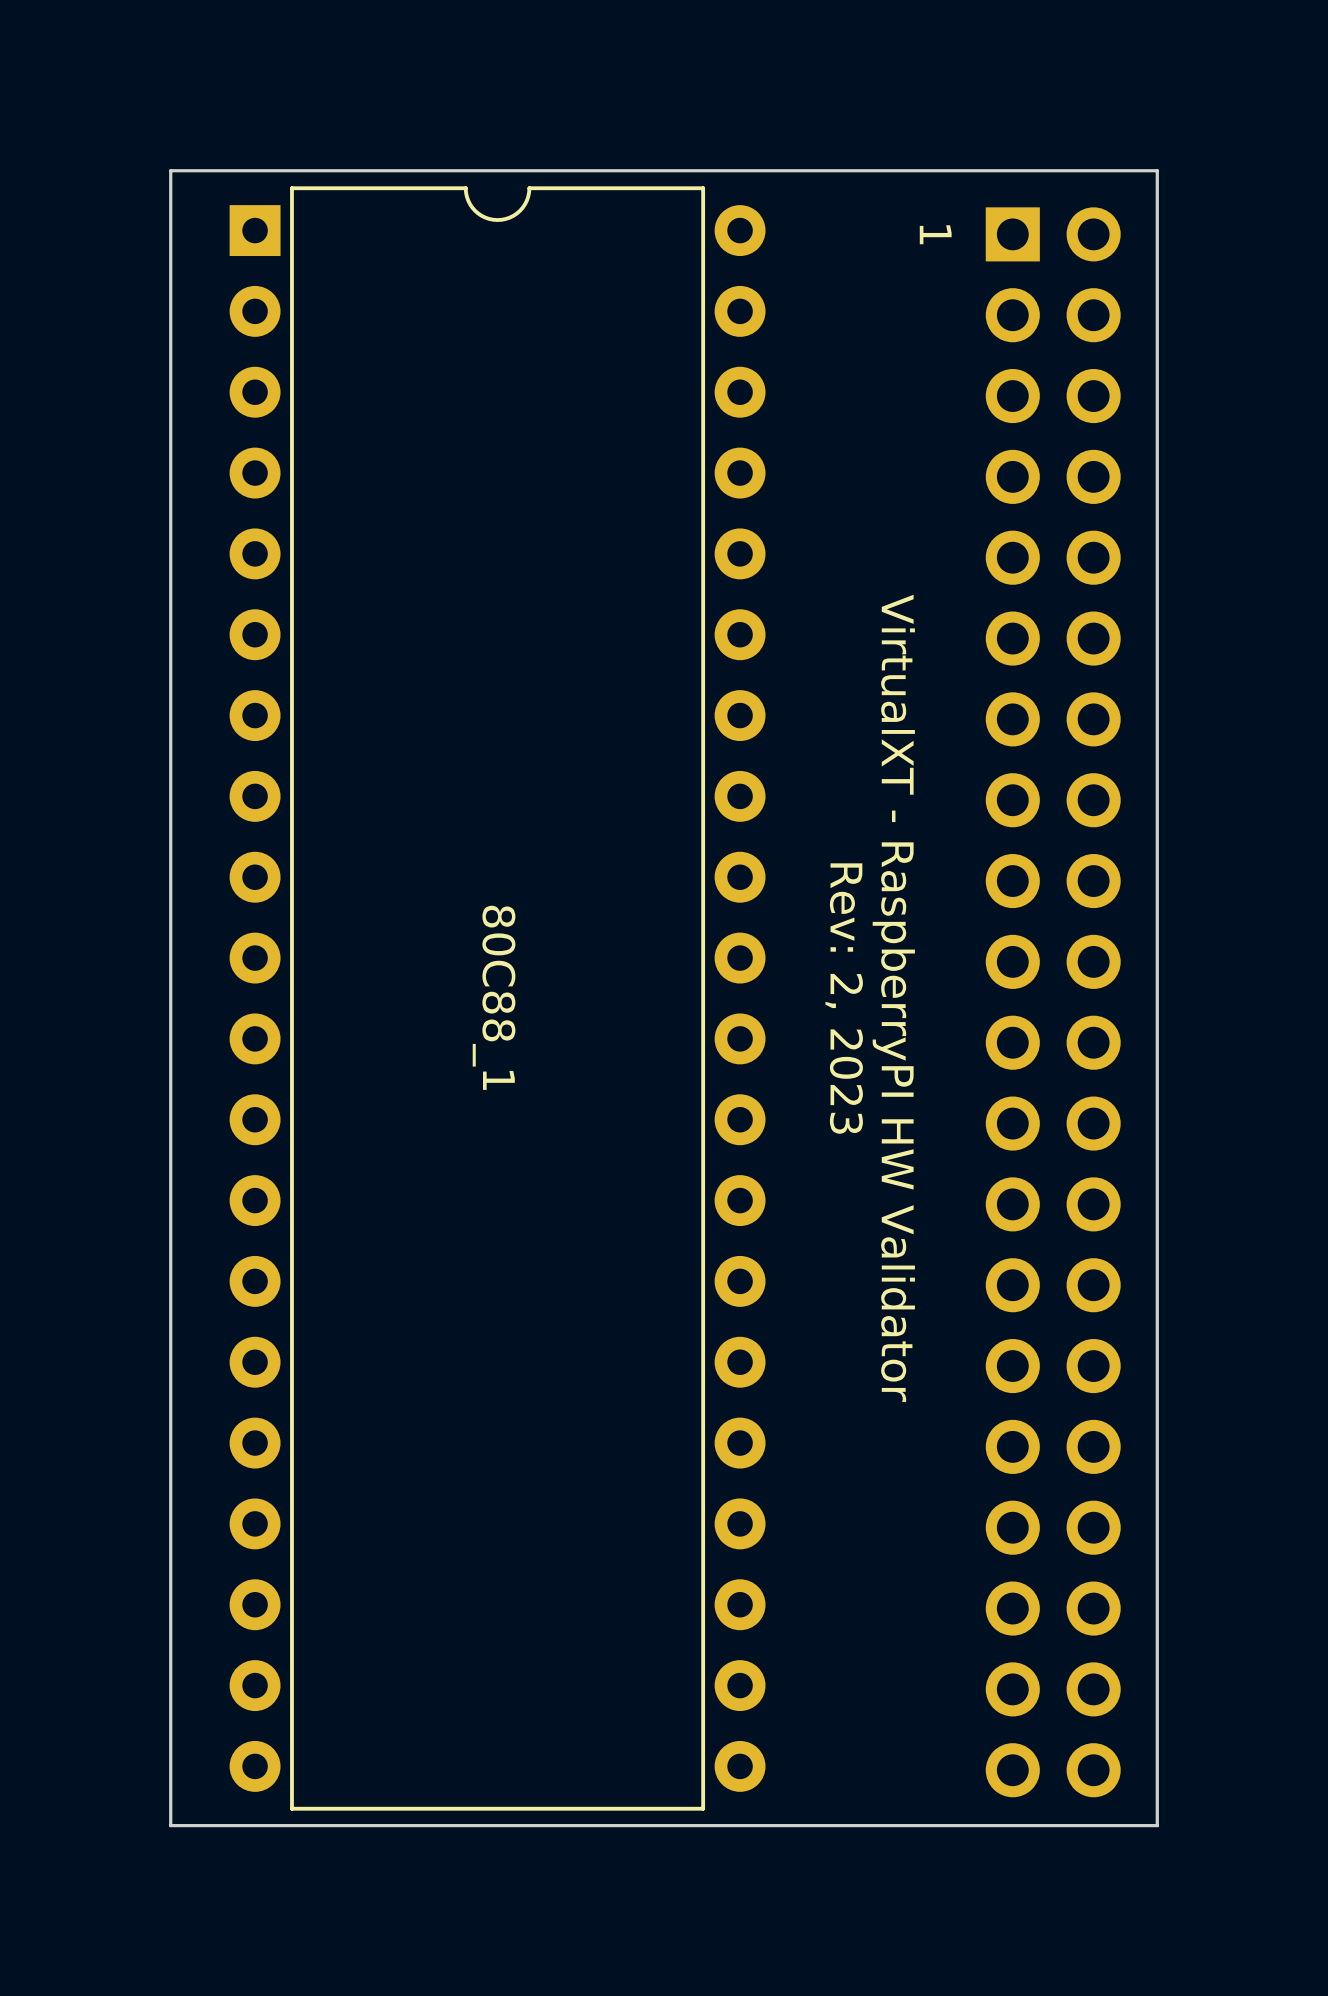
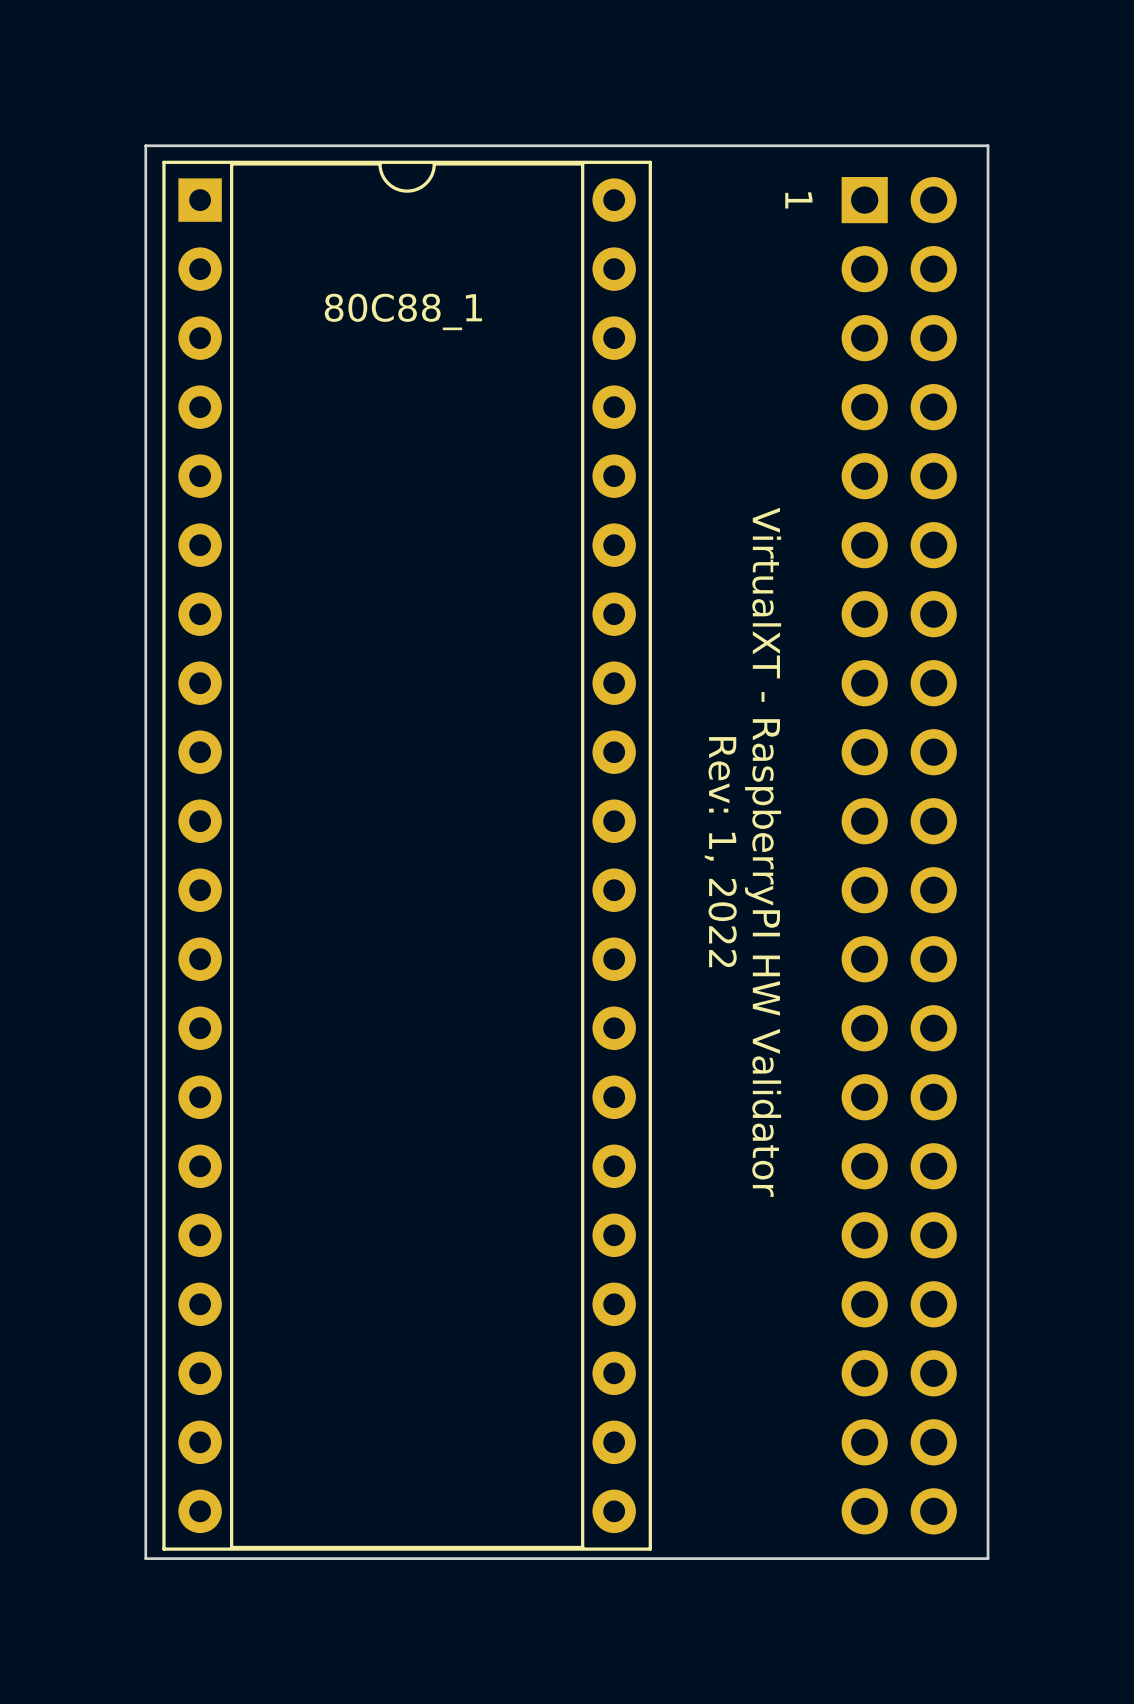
80C88_1 footprint: [229, 186, 766, 1811] -> [162, 160, 652, 1551]
80C88_1 name position: 80C88_1 (494, 997) -> 80C88_1 (403, 311)
text: Rev: 2, 2023 (844, 998) -> Rev: 1, 2022 (720, 852)

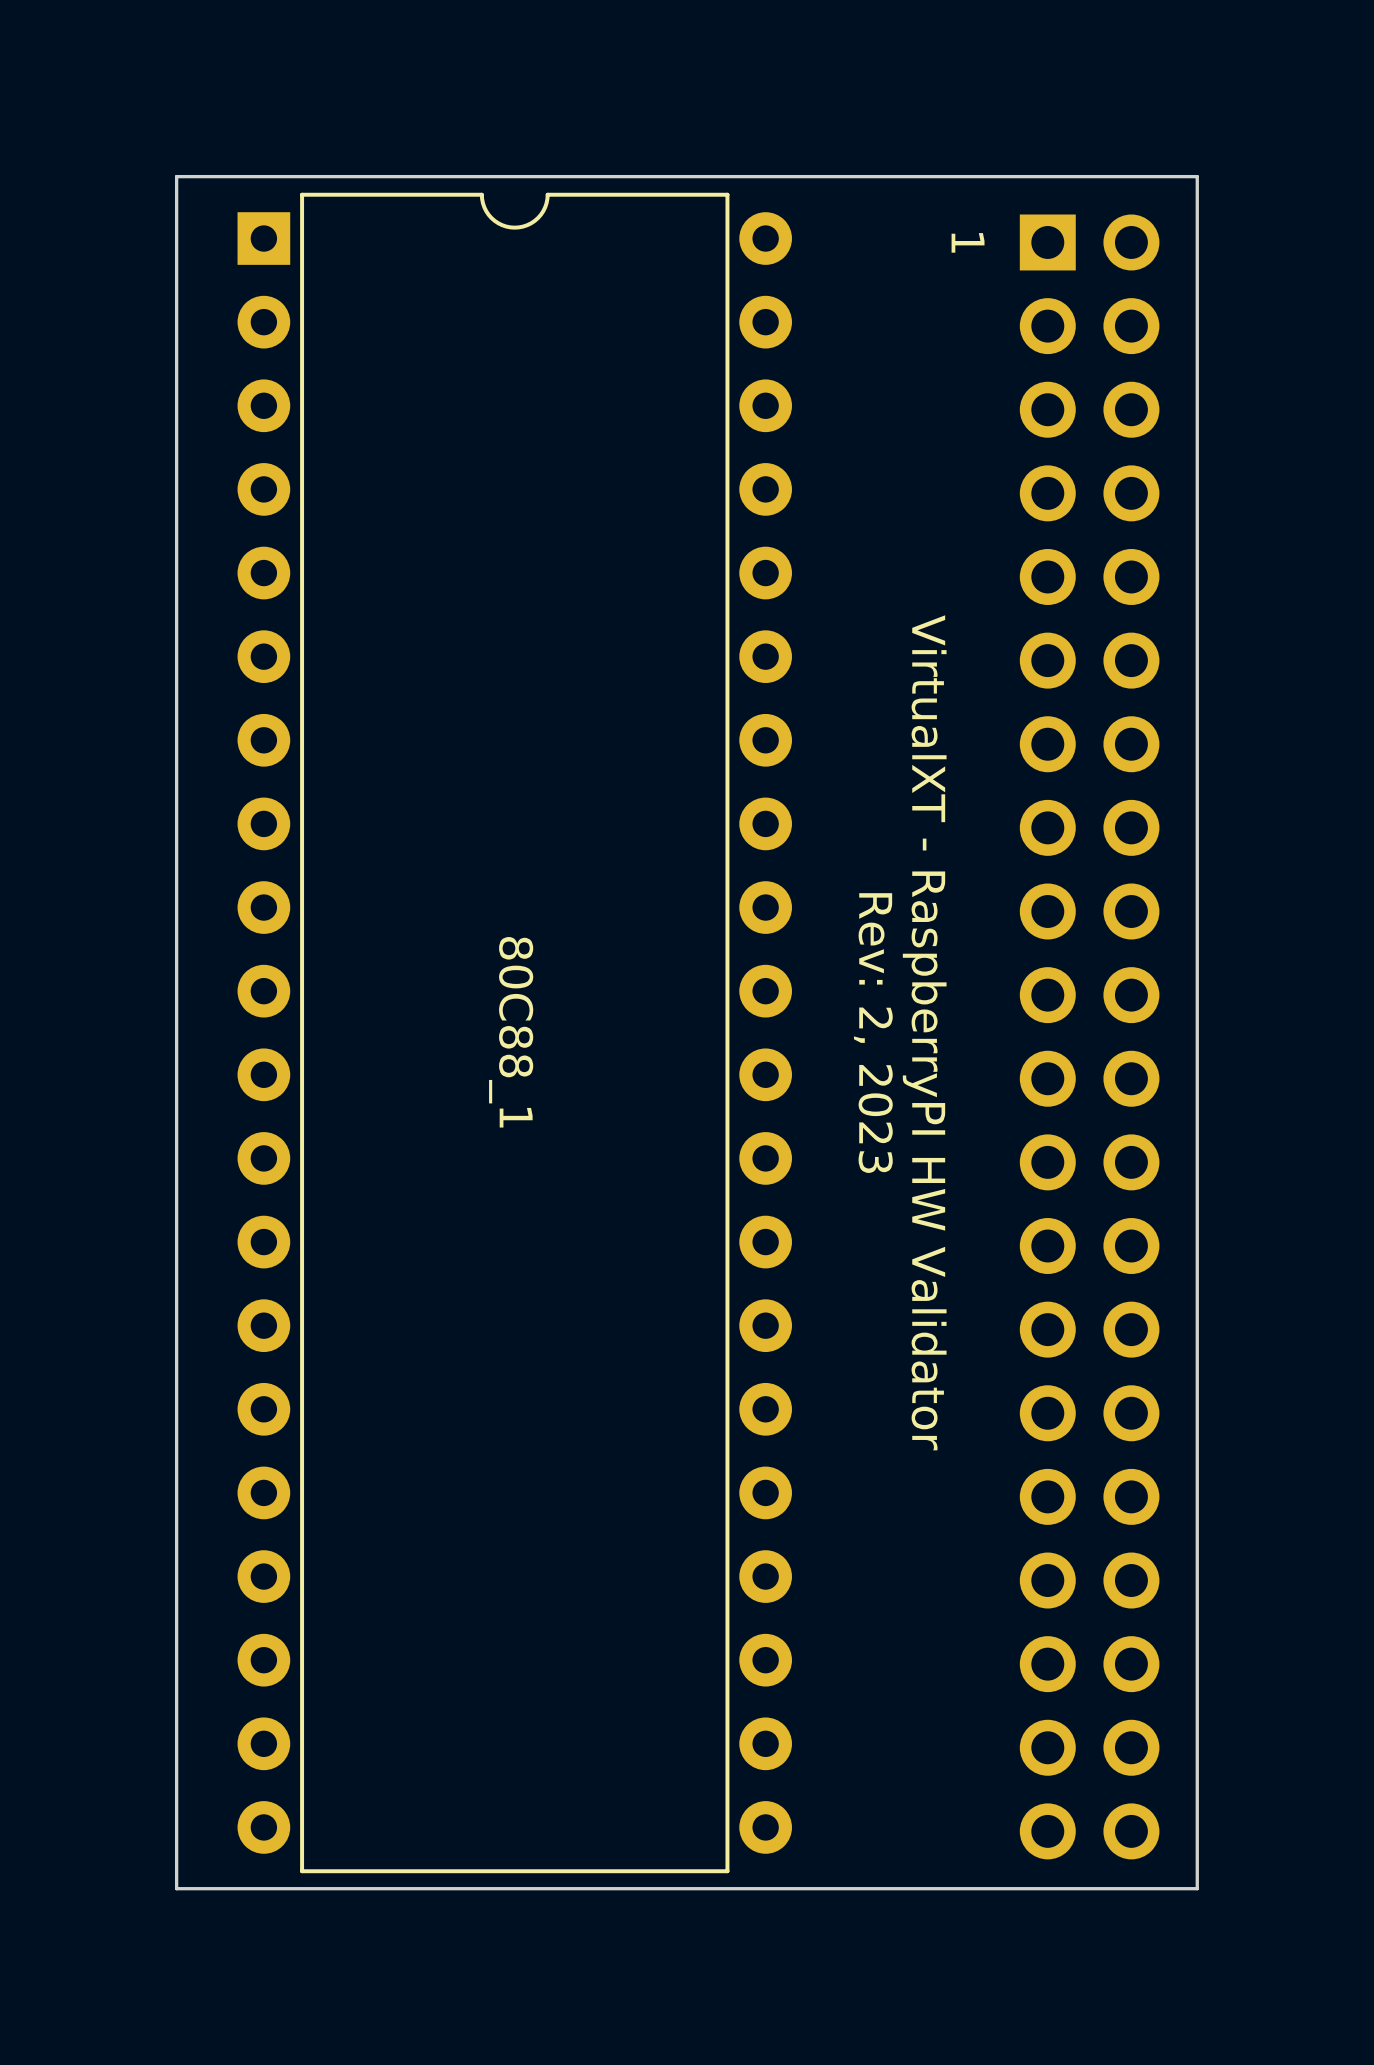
80C88_1 footprint: [162, 160, 652, 1551] -> [237, 192, 792, 1874]
80C88_1 name position: 80C88_1 (403, 311) -> 80C88_1 (511, 1032)
text: Rev: 1, 2022 (720, 852) -> Rev: 2, 2023 (873, 1033)

